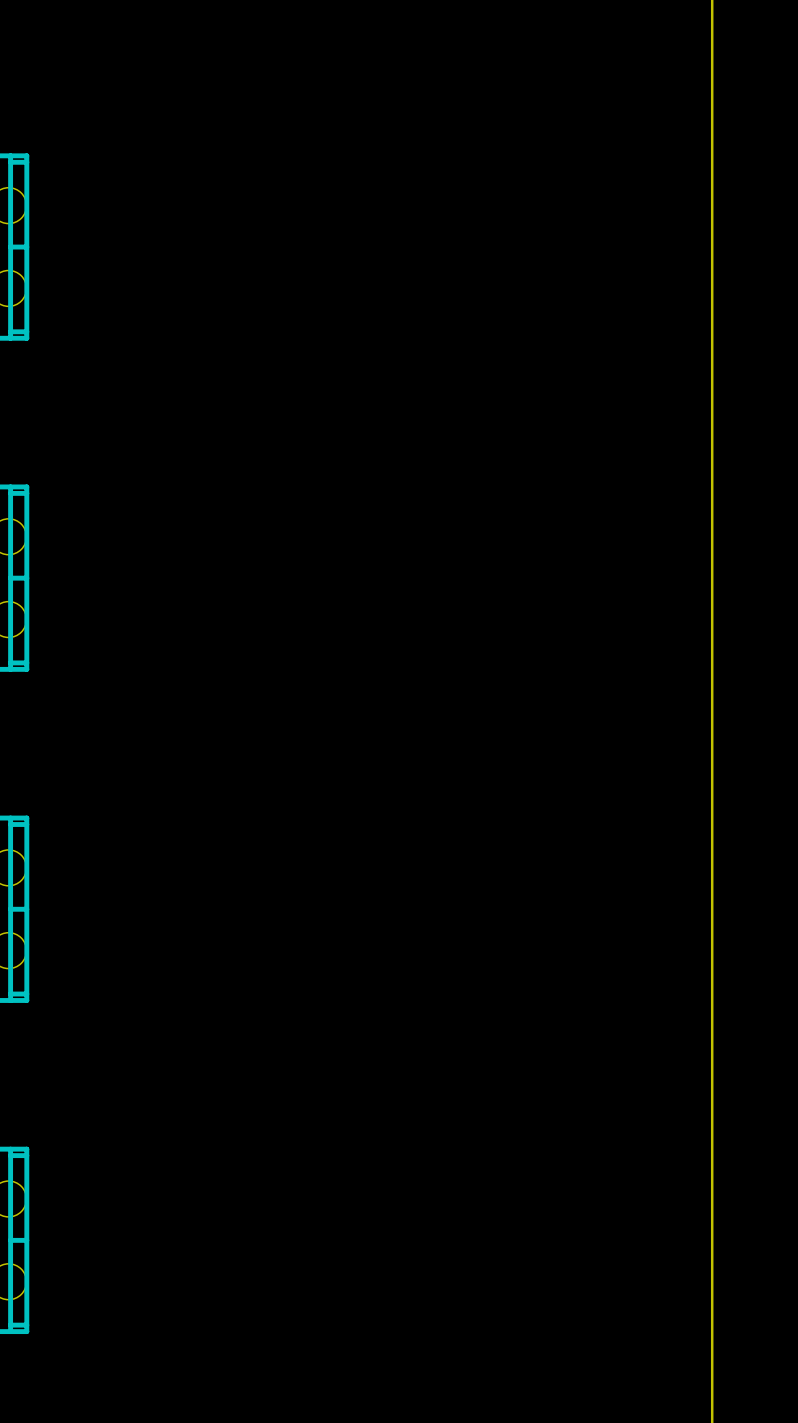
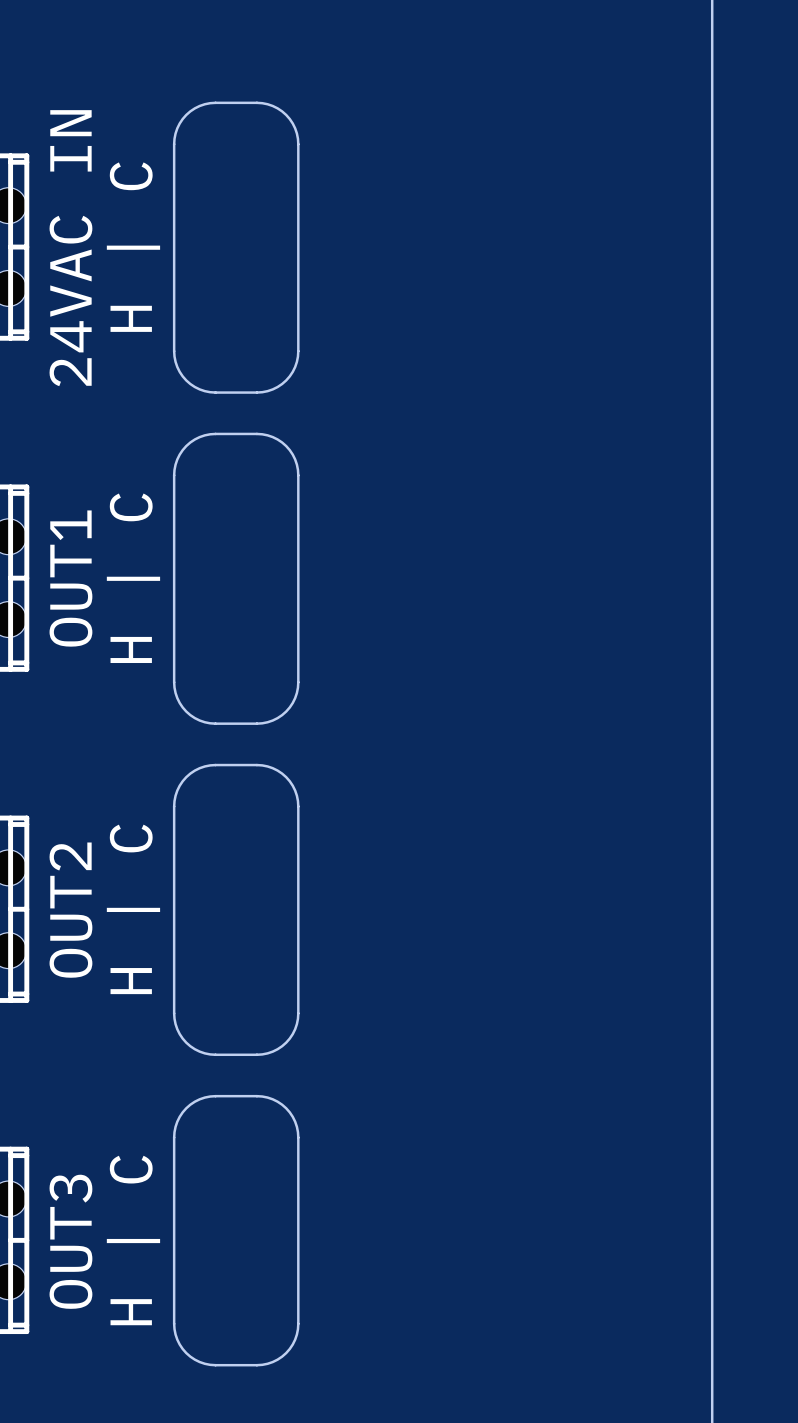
board edge: none -> (215, 102) (256, 102) (272, 105) (289, 119) (297, 138) (297, 356) (292, 371) (286, 380) (277, 387) (262, 392) (215, 392) (199, 389) (182, 376) (174, 356) (174, 138) (179, 123) (190, 111) (204, 104) (215, 102)
text: none -> H | C (133, 247)
part value: none -> 24VAC IN (70, 248)
board edge: none -> (215, 433) (256, 433) (272, 437) (289, 450) (297, 469) (297, 687) (292, 702) (286, 711) (277, 718) (262, 723) (215, 723) (199, 720) (182, 707) (174, 687) (174, 469) (179, 454) (190, 442) (204, 435) (215, 433)
text: none -> H | C (133, 578)
part value: none -> OUT1 (70, 578)
board edge: none -> (215, 765) (256, 765) (272, 768) (289, 781) (297, 801) (297, 1018) (292, 1034) (286, 1042) (277, 1049) (262, 1054) (215, 1054) (199, 1051) (182, 1038) (174, 1018) (174, 801) (179, 785) (190, 773) (204, 766) (215, 765)
text: none -> H | C (133, 909)
part value: none -> OUT2 (70, 910)
board edge: none -> (215, 1096) (256, 1096) (272, 1099) (289, 1112) (297, 1132) (297, 1329) (292, 1344) (286, 1353) (277, 1359) (262, 1364) (215, 1365) (199, 1362) (182, 1348) (174, 1329) (174, 1132) (179, 1116) (190, 1104) (204, 1097) (215, 1096)
text: none -> H | C (133, 1240)
part value: none -> OUT3 (70, 1241)

